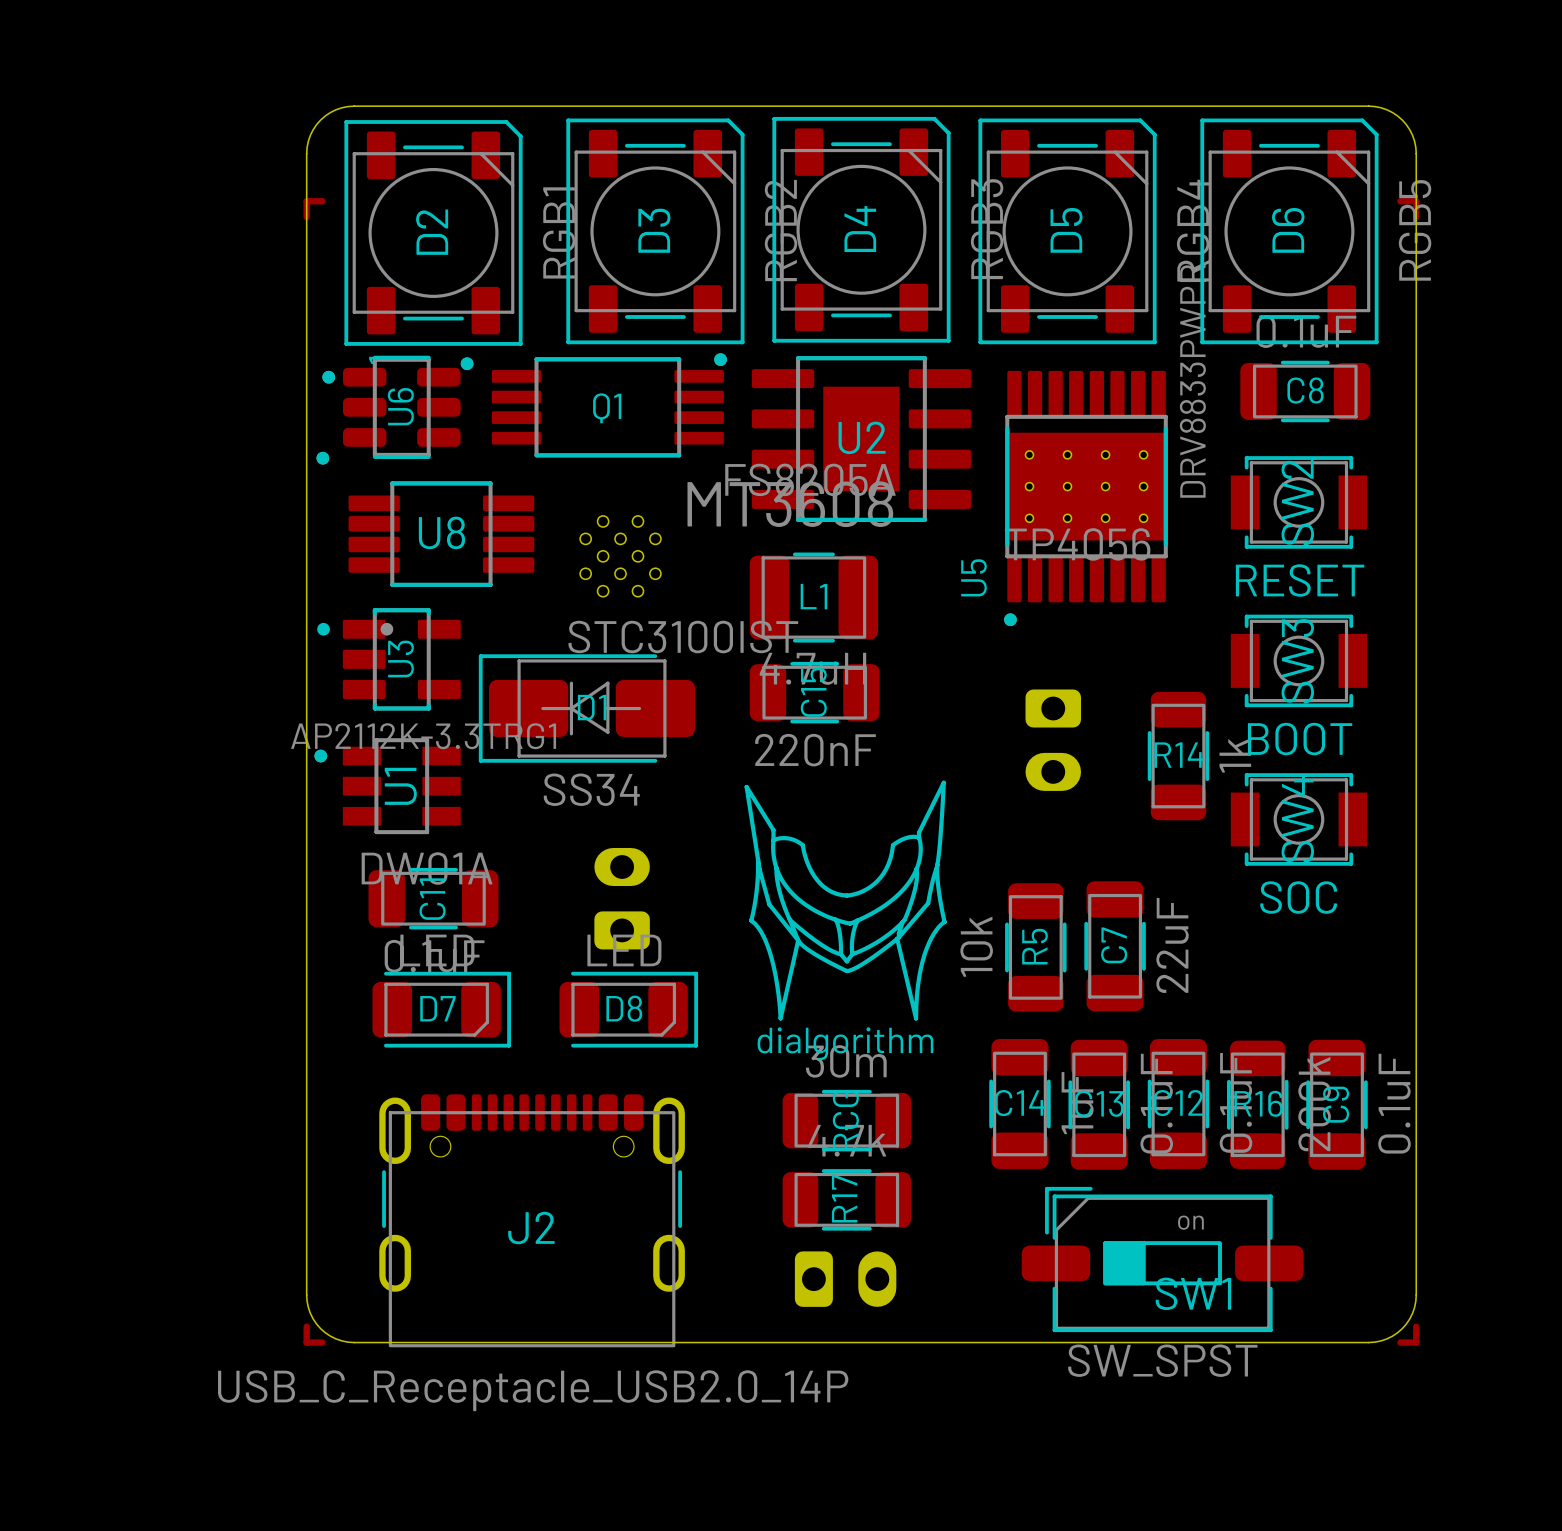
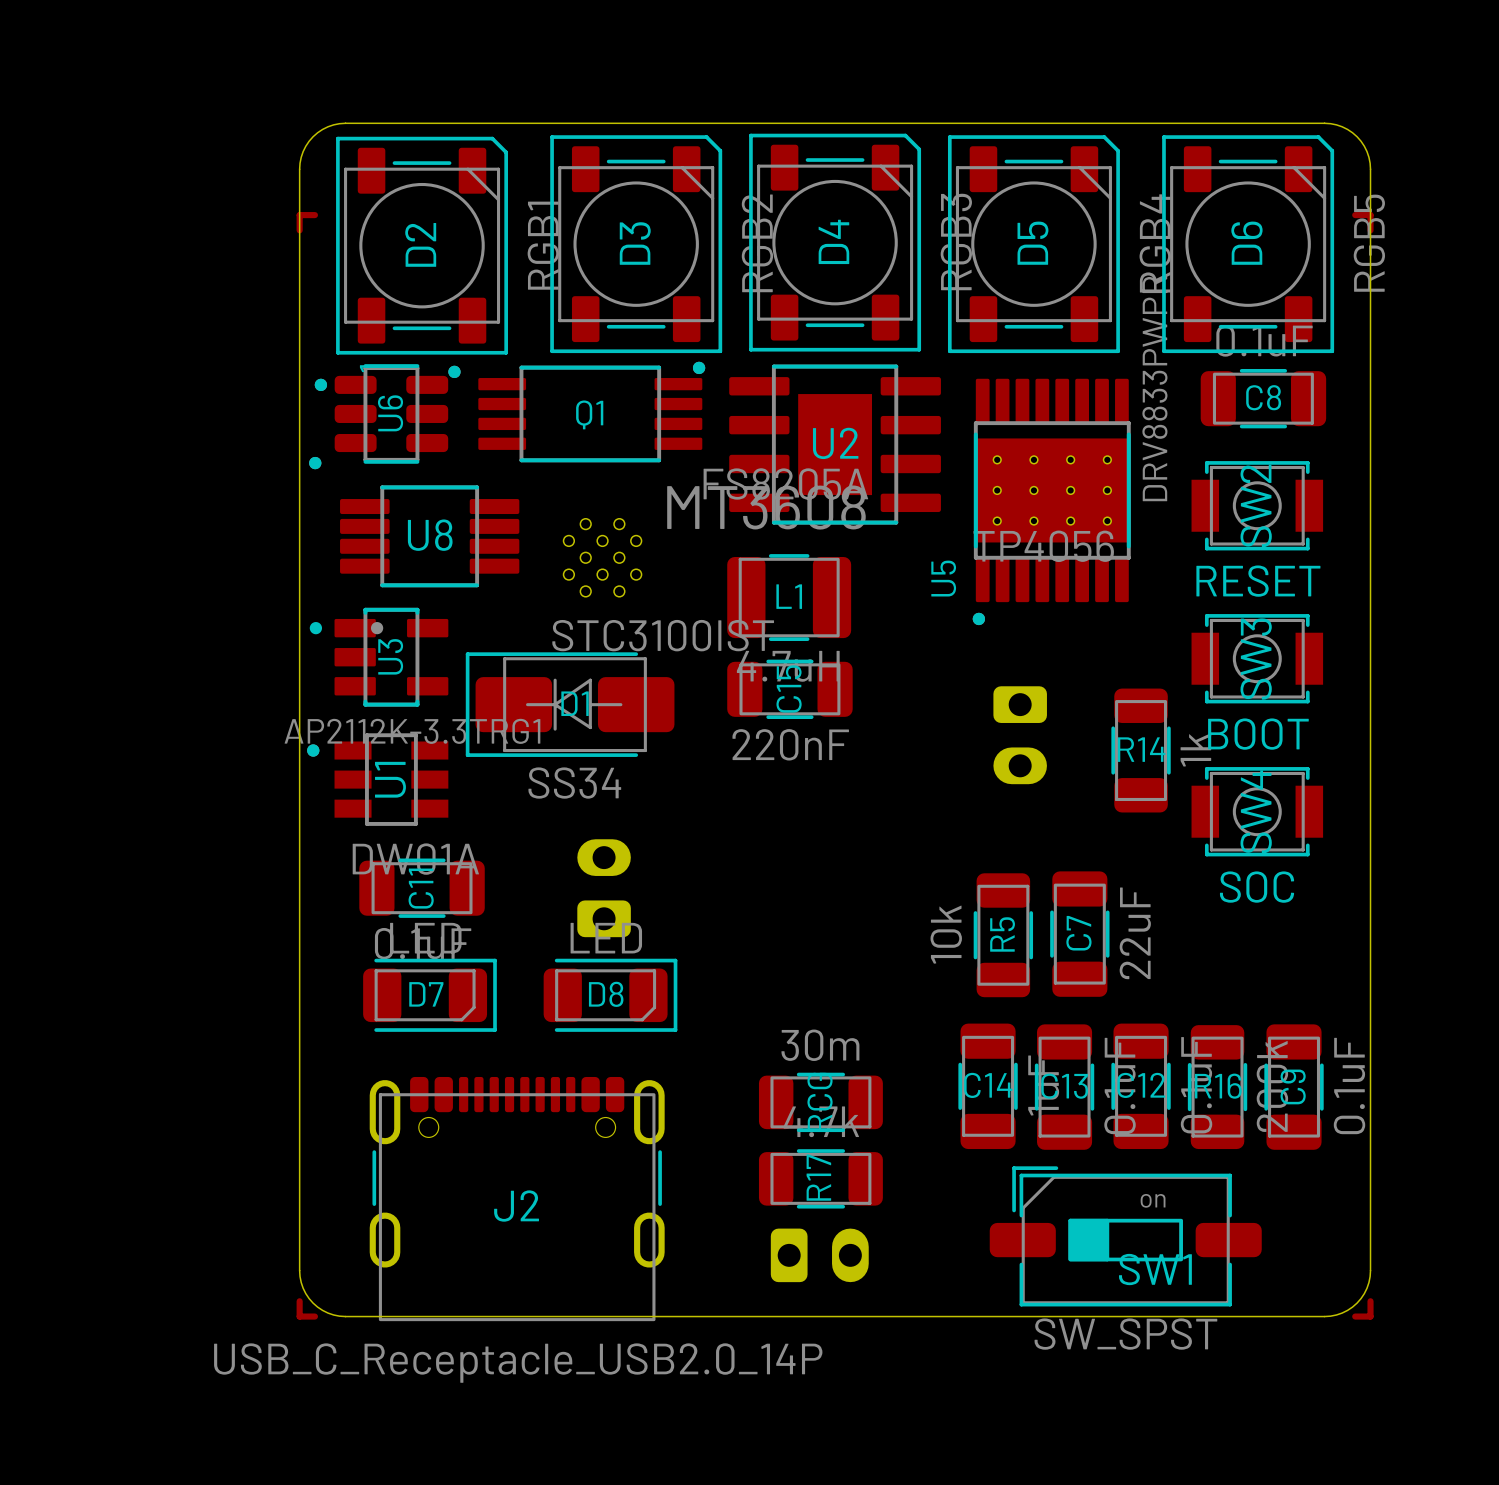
drawing: [744, 780, 947, 1021] -> none

